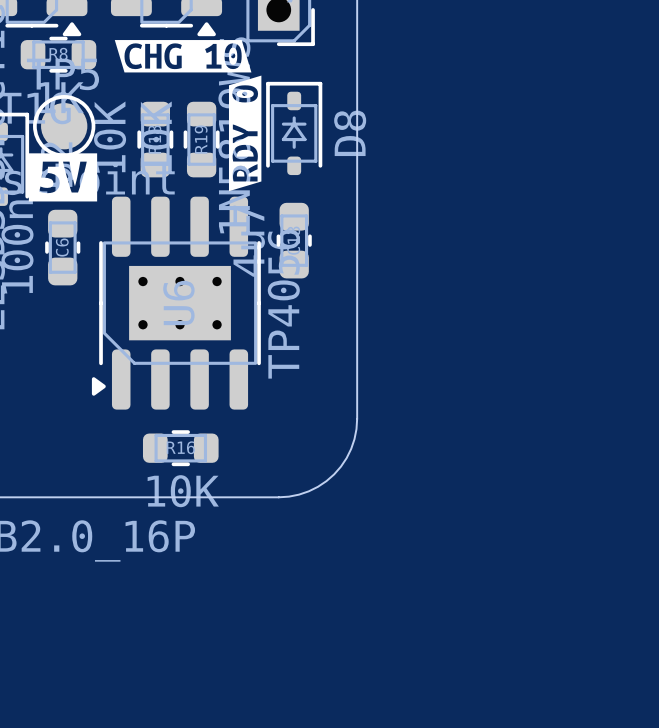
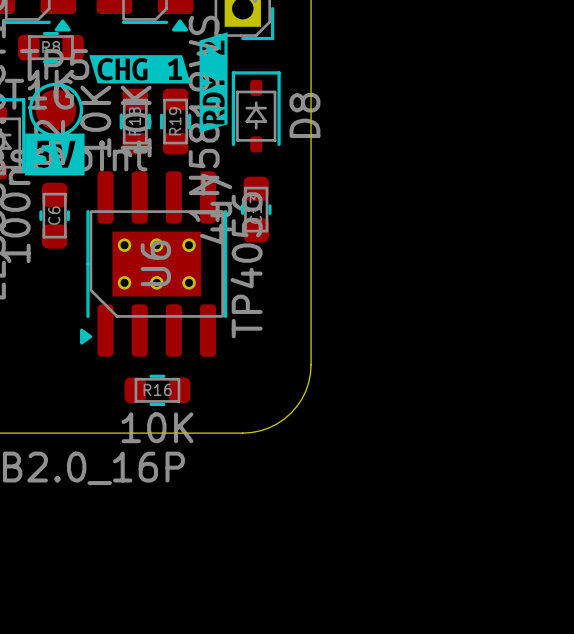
drawing: none -> [89, 32, 228, 133]
drawing: [114, 40, 262, 192] -> none

